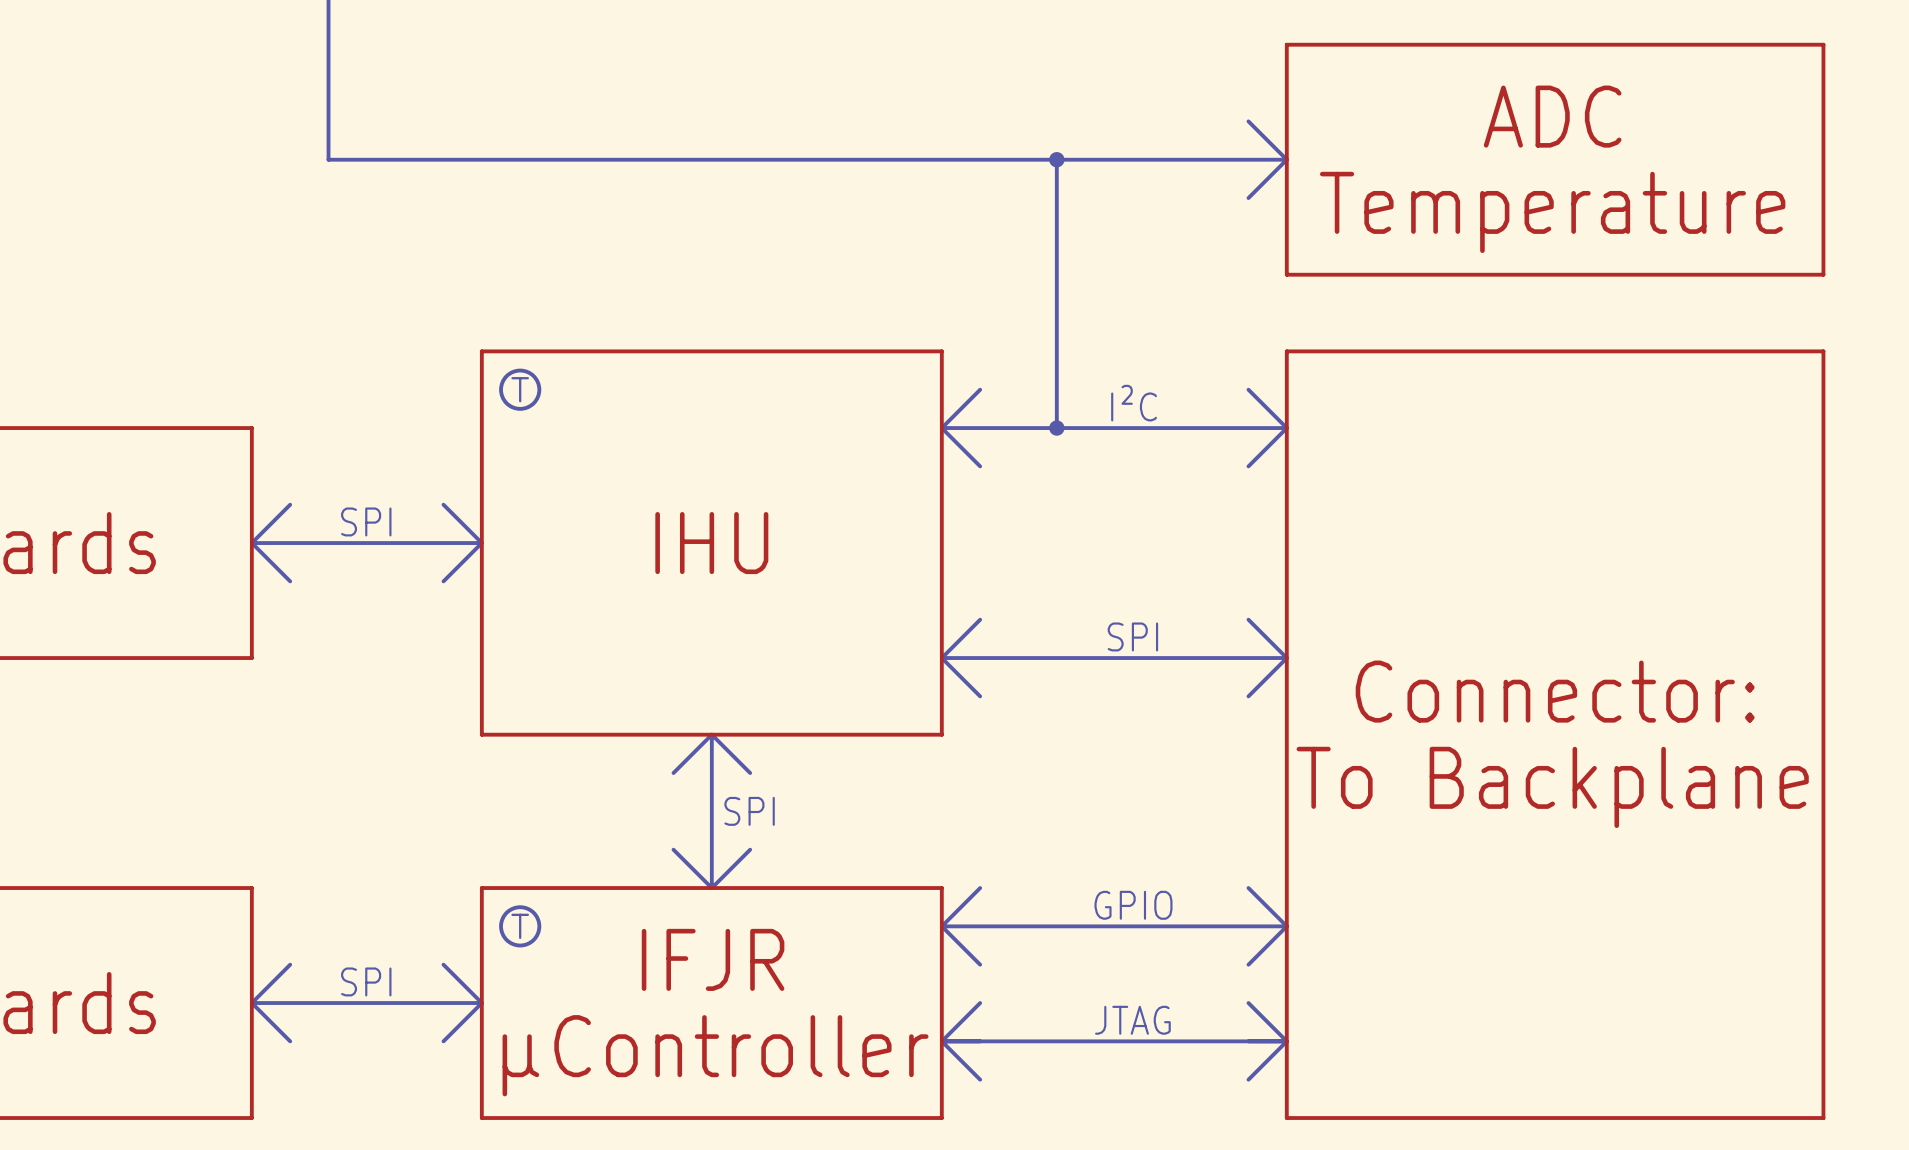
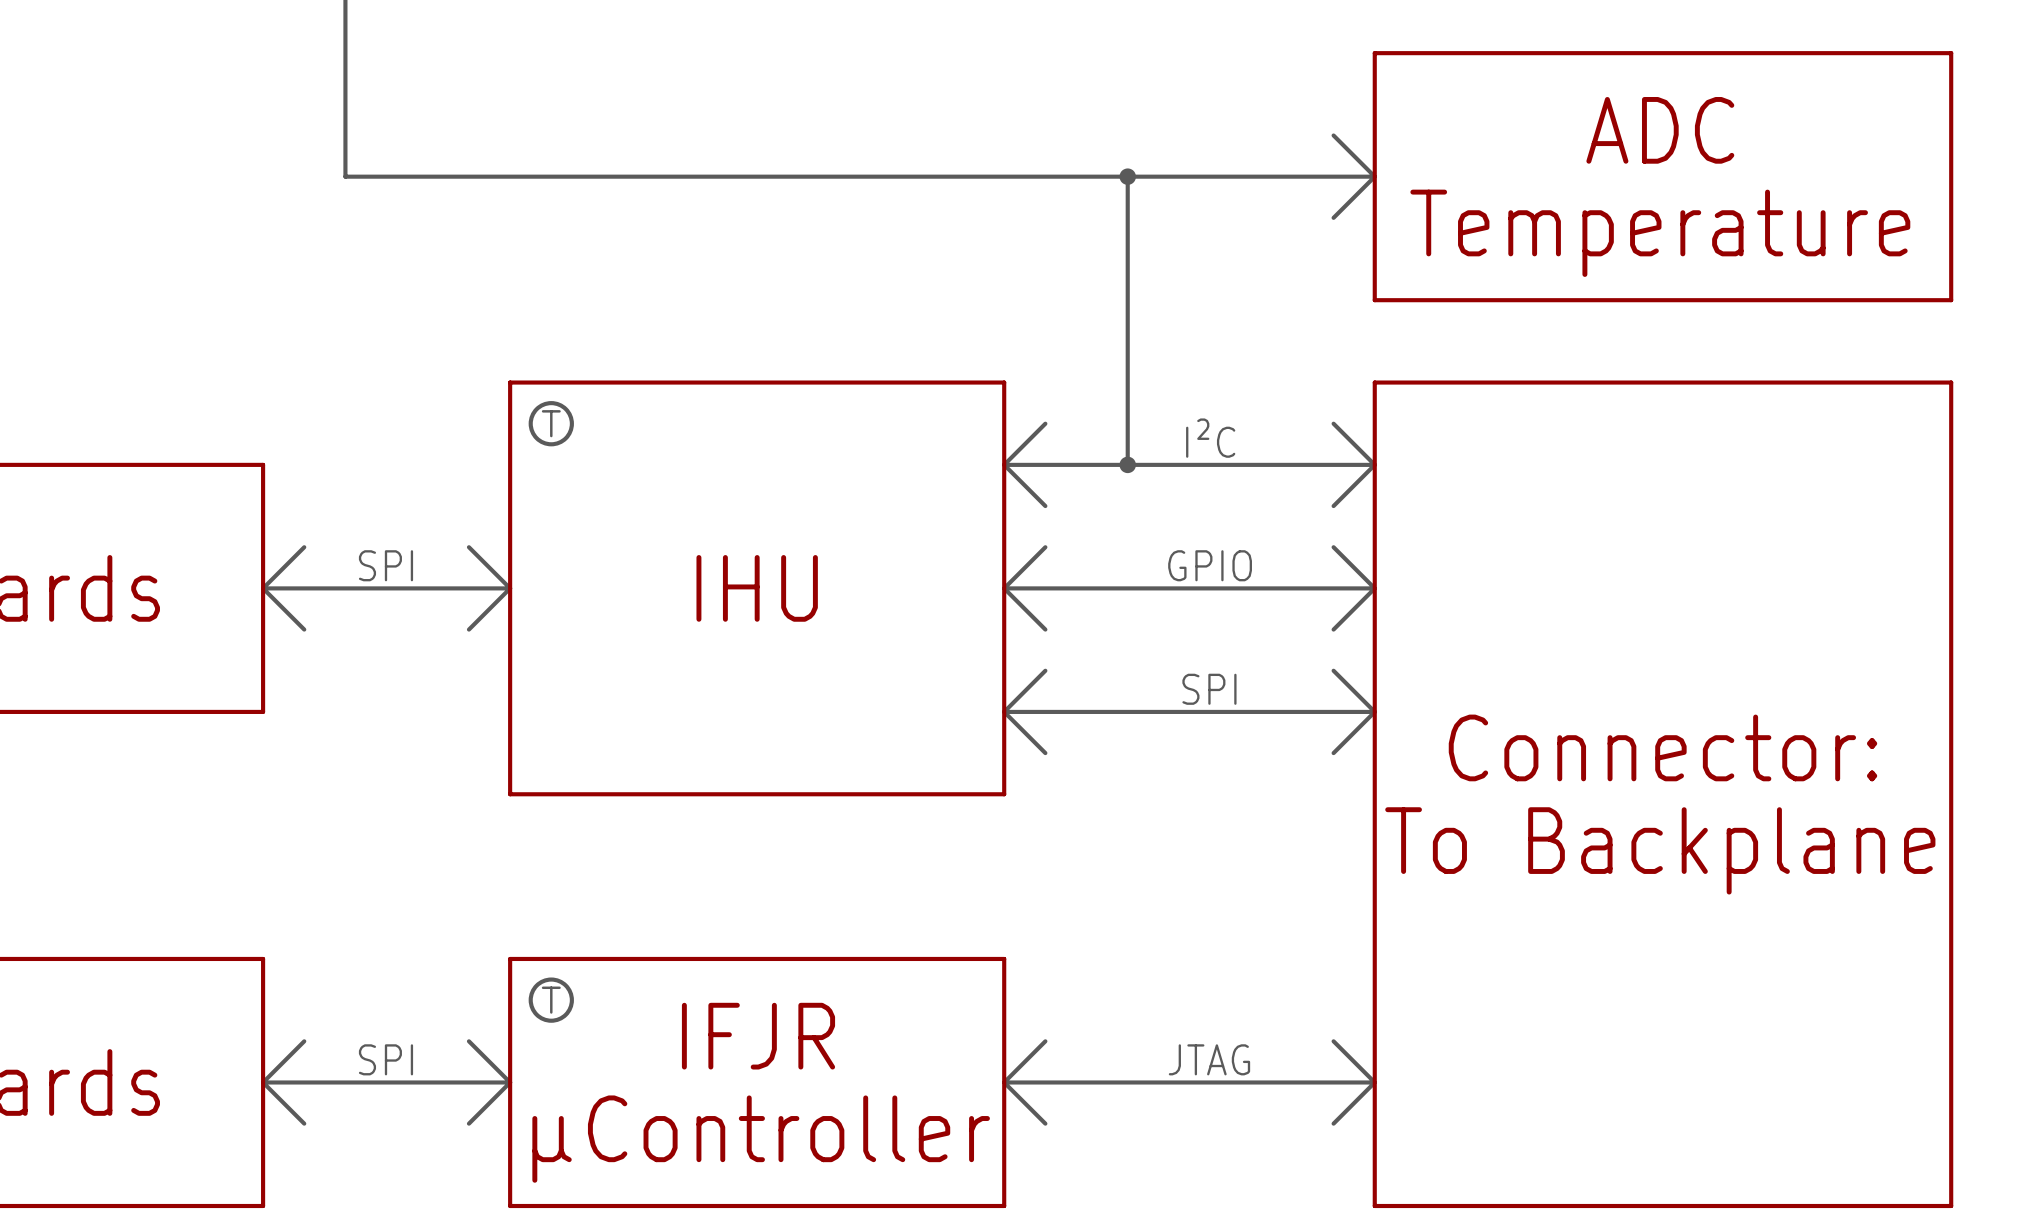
line: none -> (1333, 547) (1374, 588)
text: none -> GPIO (1210, 565)
line: none -> (1004, 588) (1374, 588)
line: none -> (1374, 588) (1333, 629)
line: (711, 734) (750, 773) -> (1004, 588) (1045, 629)
line: (711, 734) (673, 773) -> (1045, 547) (1004, 588)
line: (711, 734) (711, 888) -> none
text: SPI (749, 811) -> none
line: (673, 849) (711, 888) -> none
line: (750, 849) (711, 888) -> none
line: (980, 888) (941, 926) -> none
line: (1248, 888) (1286, 926) -> none
text: GPIO (1133, 905) -> none
line: (941, 926) (980, 964) -> (1004, 1082) (1045, 1041)
line: (941, 926) (1286, 926) -> none
line: (1286, 926) (1248, 964) -> (1374, 1082) (1333, 1041)
line: (980, 1003) (941, 1041) -> none
line: (1248, 1003) (1286, 1041) -> none
text position: JTAG (1132, 1020) -> JTAG (1209, 1059)
line: (941, 1041) (1286, 1041) -> (1004, 1082) (1374, 1082)
line: (941, 1041) (980, 1079) -> (1004, 1082) (1045, 1123)
line: (1286, 1041) (1248, 1079) -> (1374, 1082) (1333, 1123)

